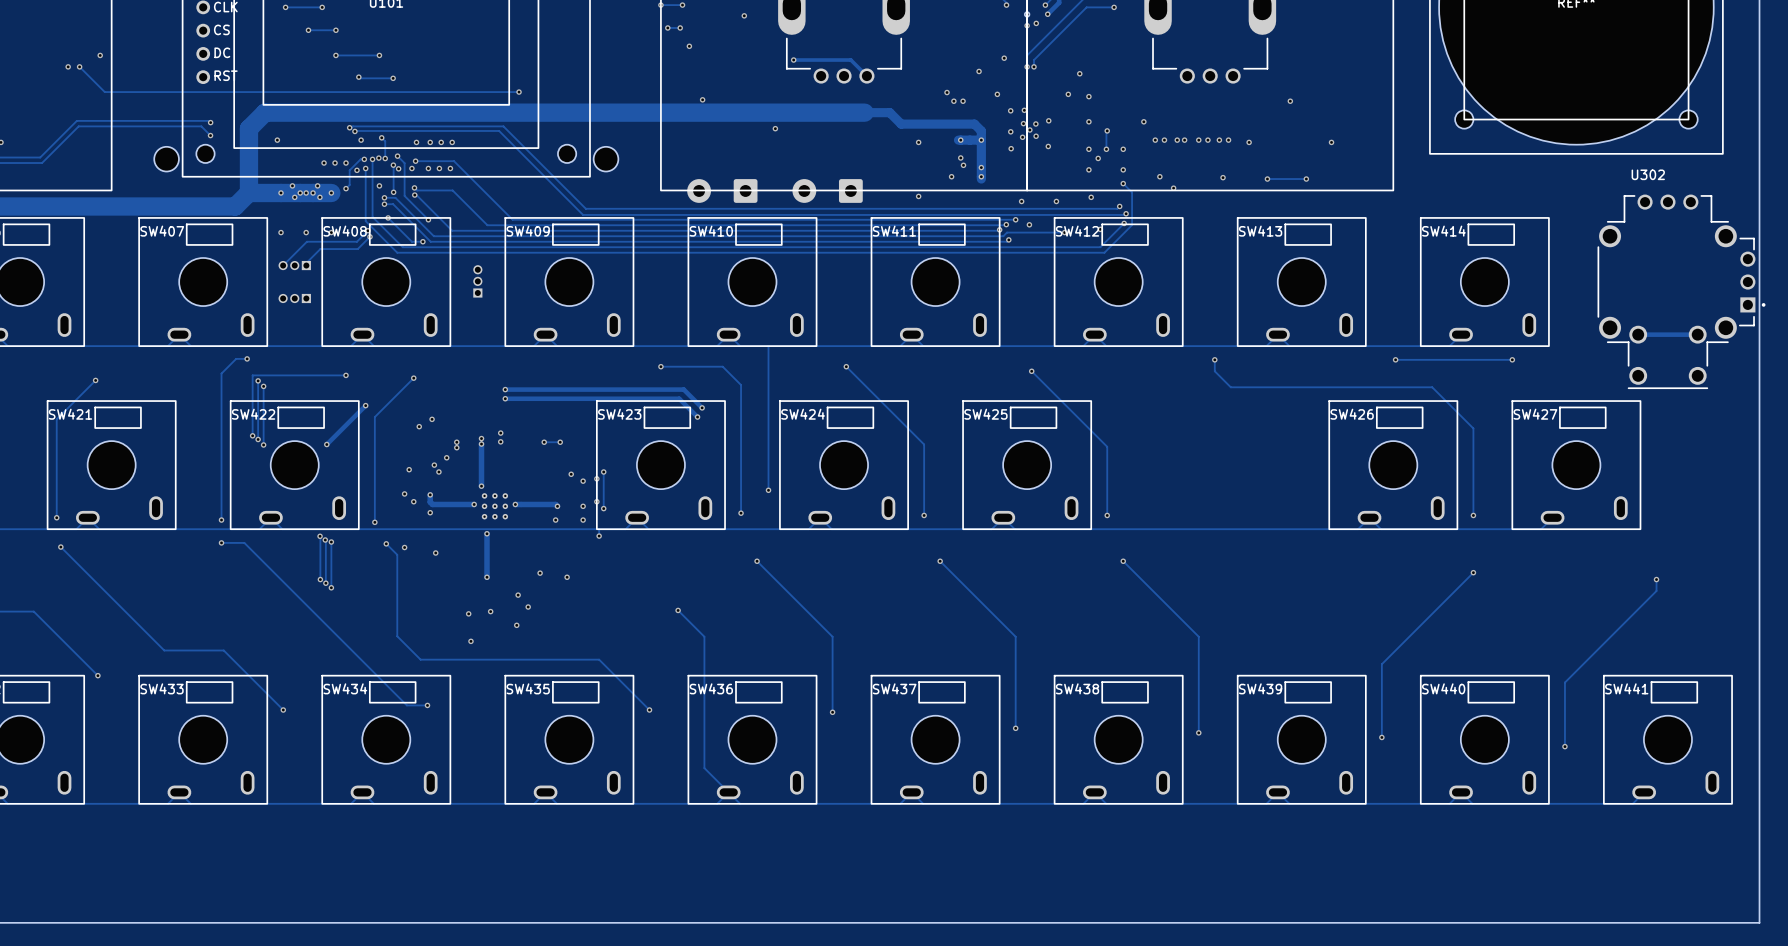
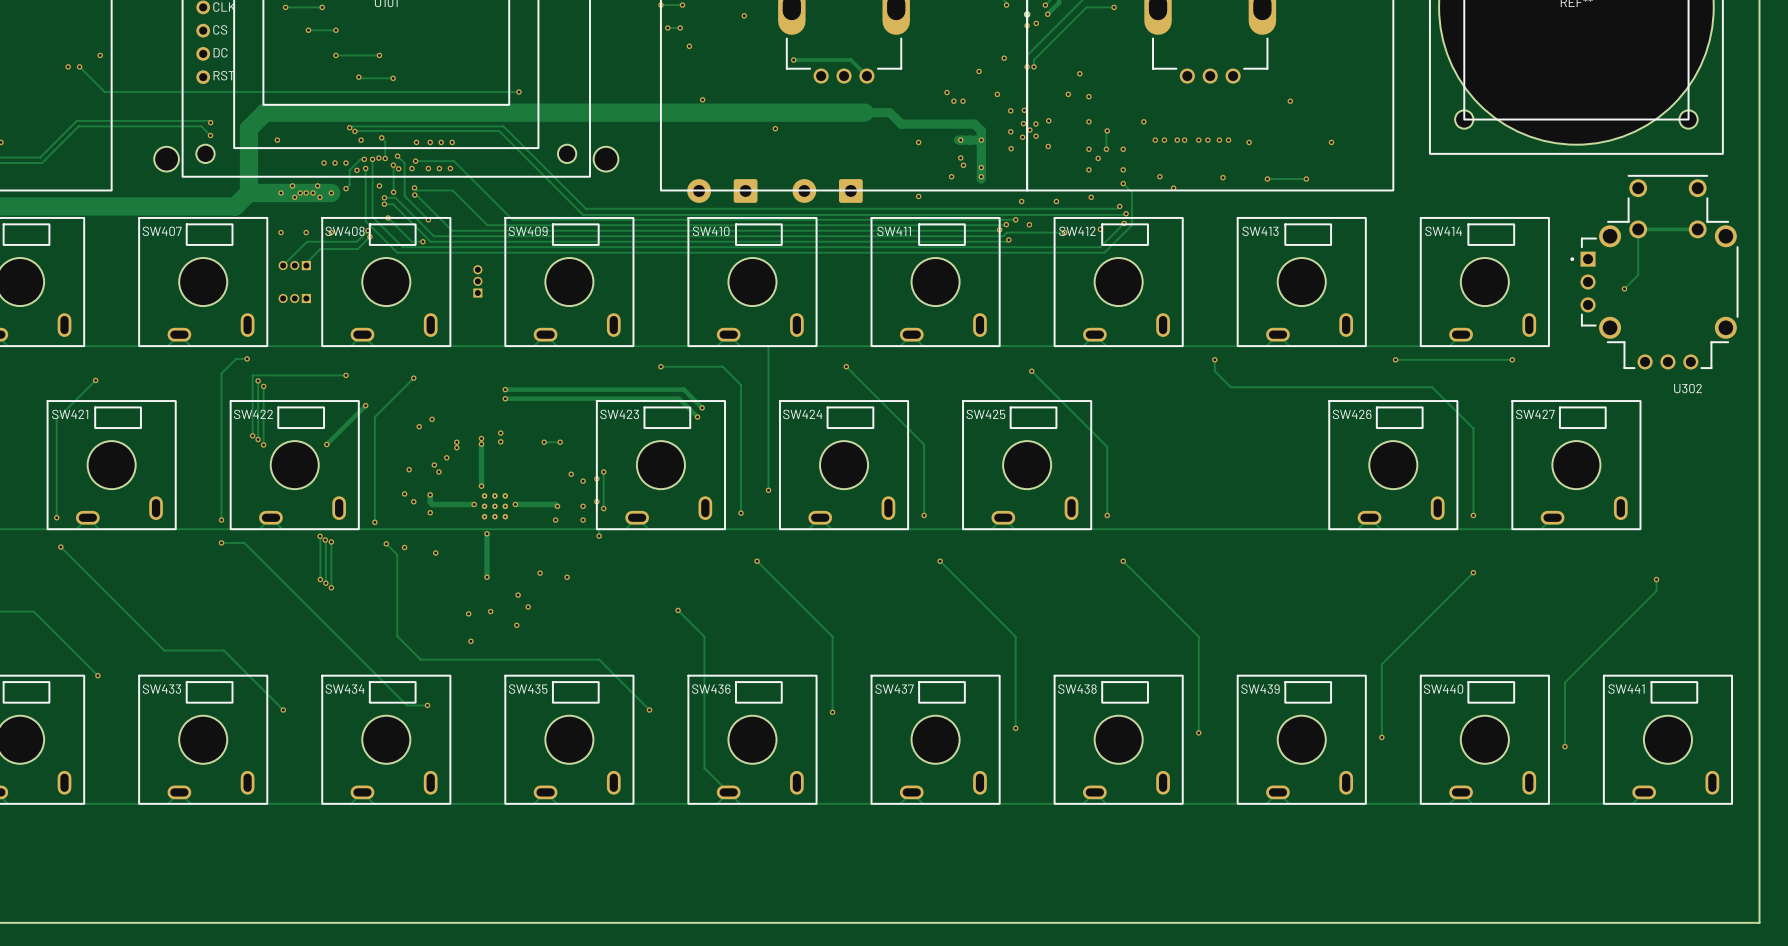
track: none -> (1697, 229) (1638, 229) (1638, 275) (1624, 288)
via: none -> (1624, 288)
U302 rotation: 0° (1681, 291) -> 180° (1654, 272)
track: (1638, 334) (1697, 334) -> none

